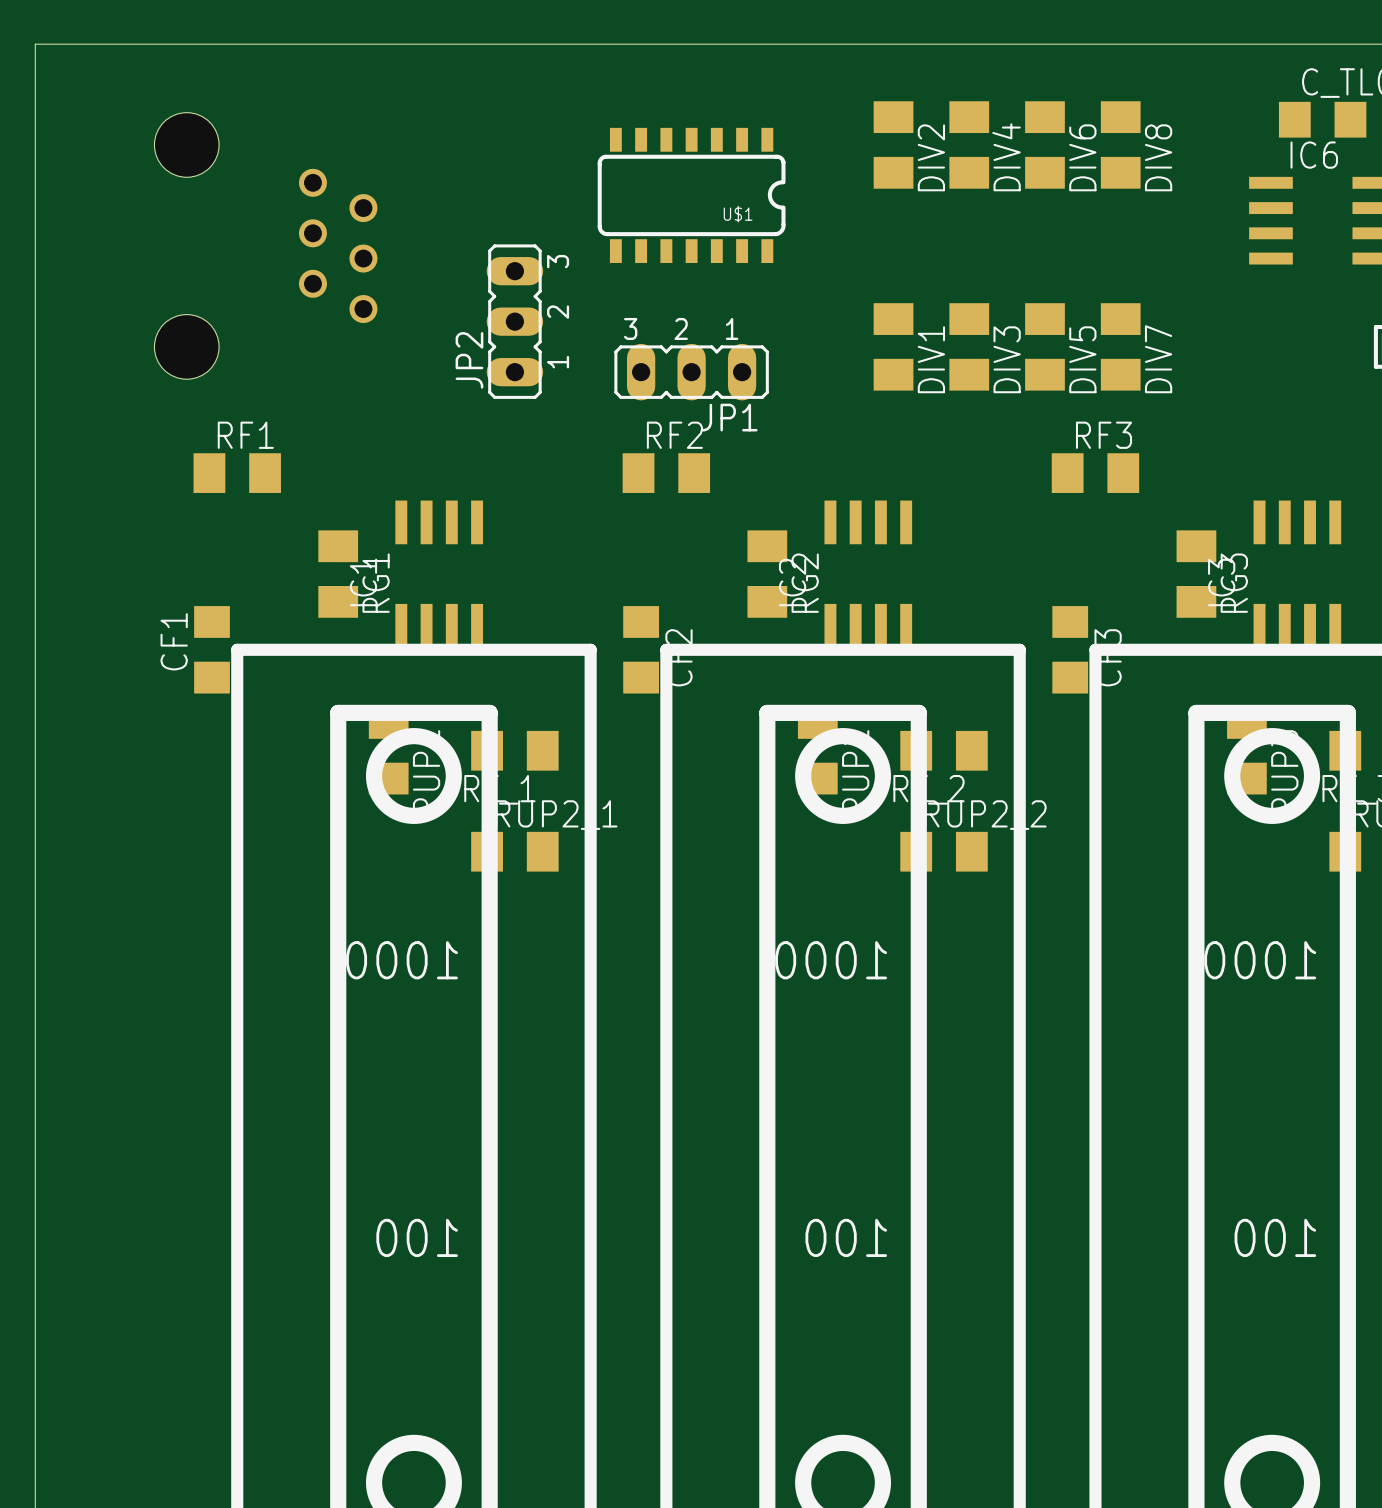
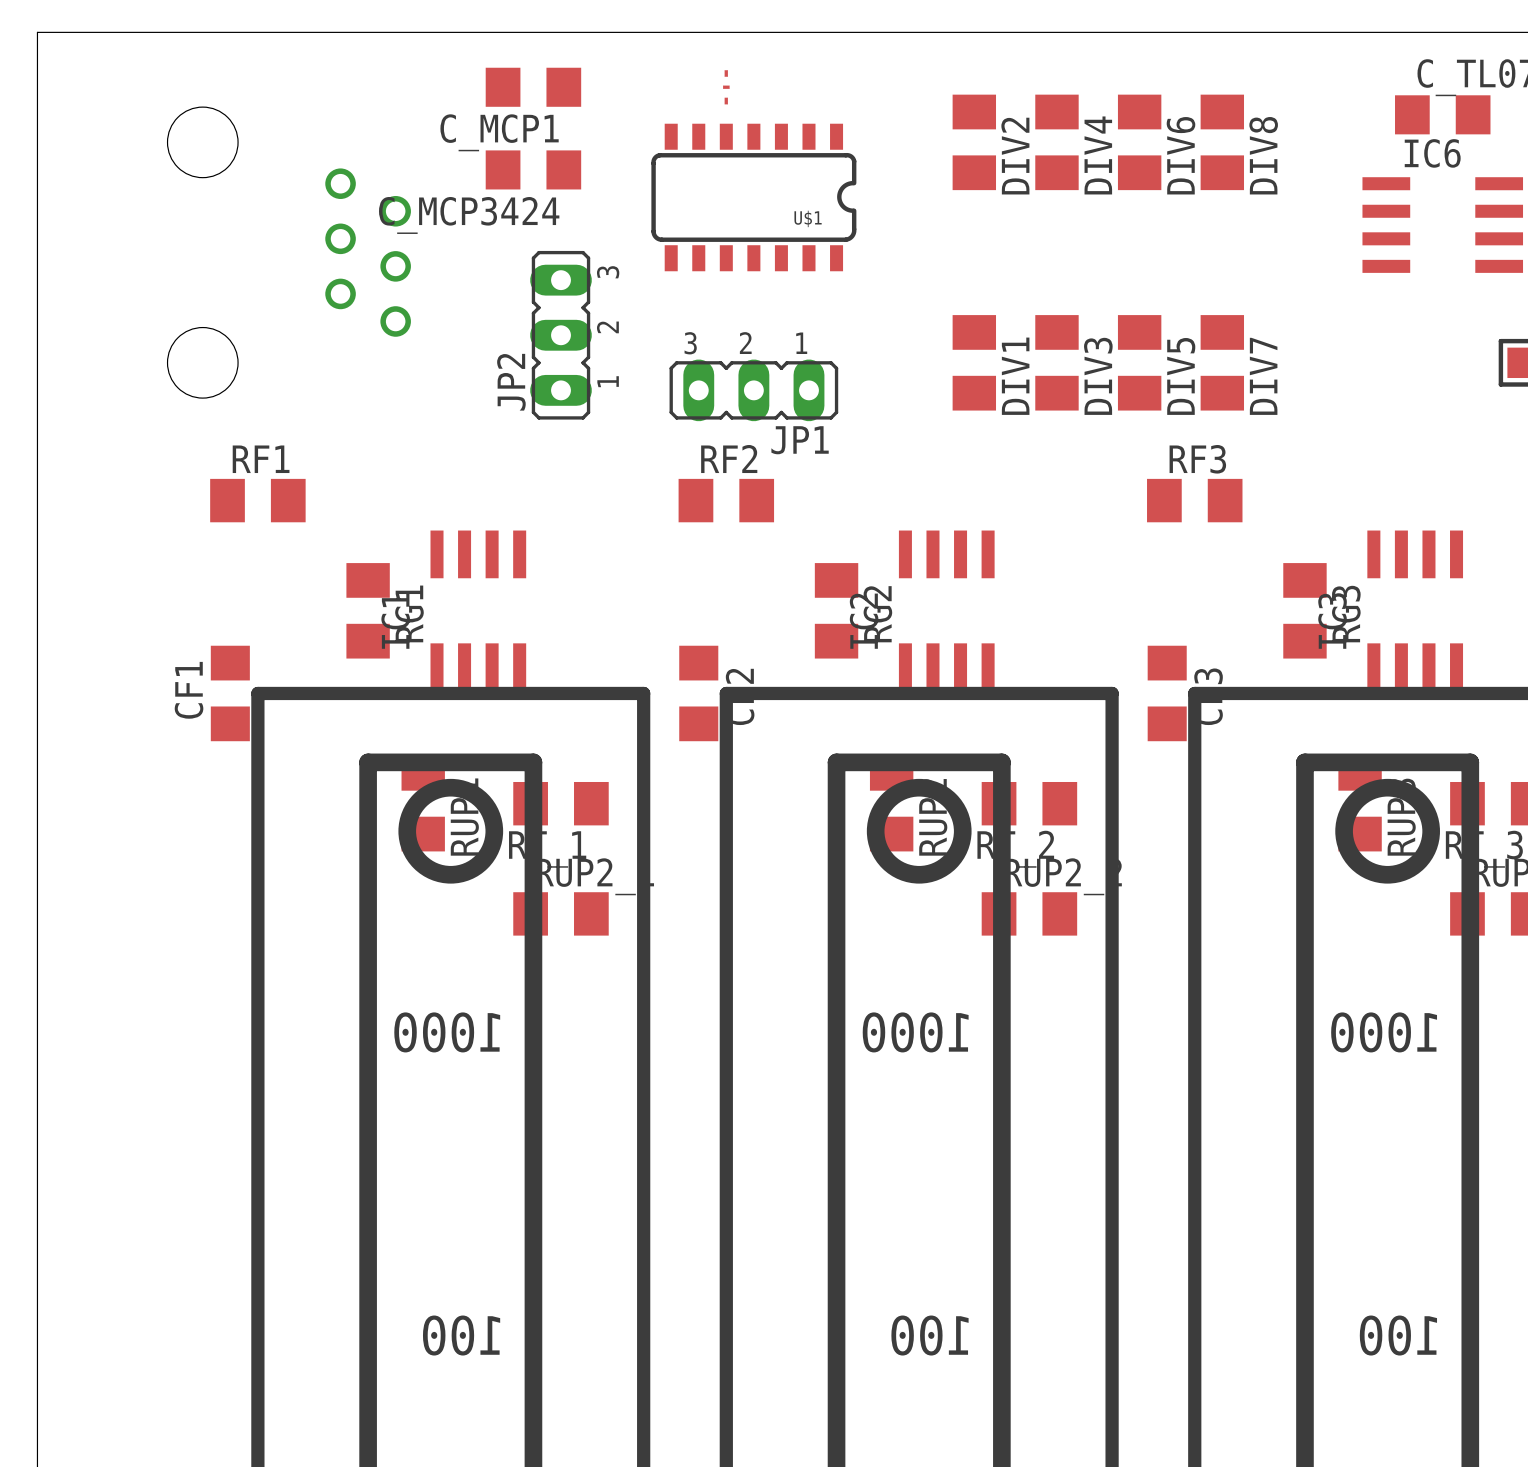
C_MCP1: none -> (533, 87)
part: none -> (726, 87)
C_MCP3424: none -> (533, 169)

